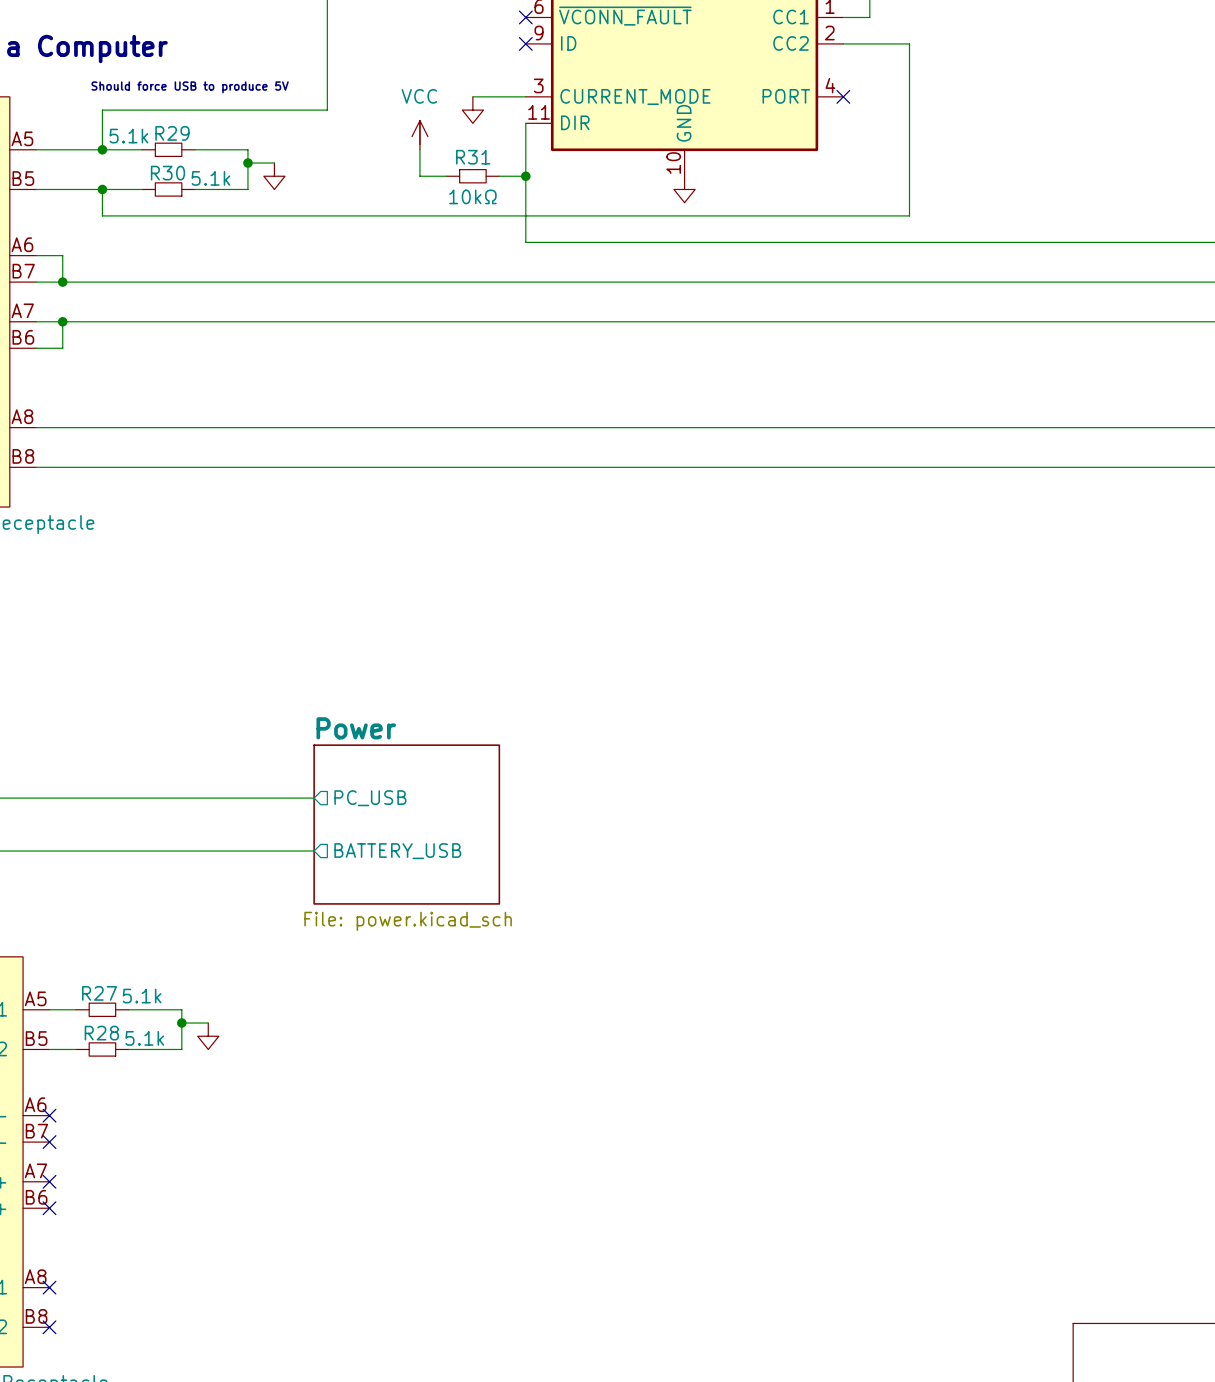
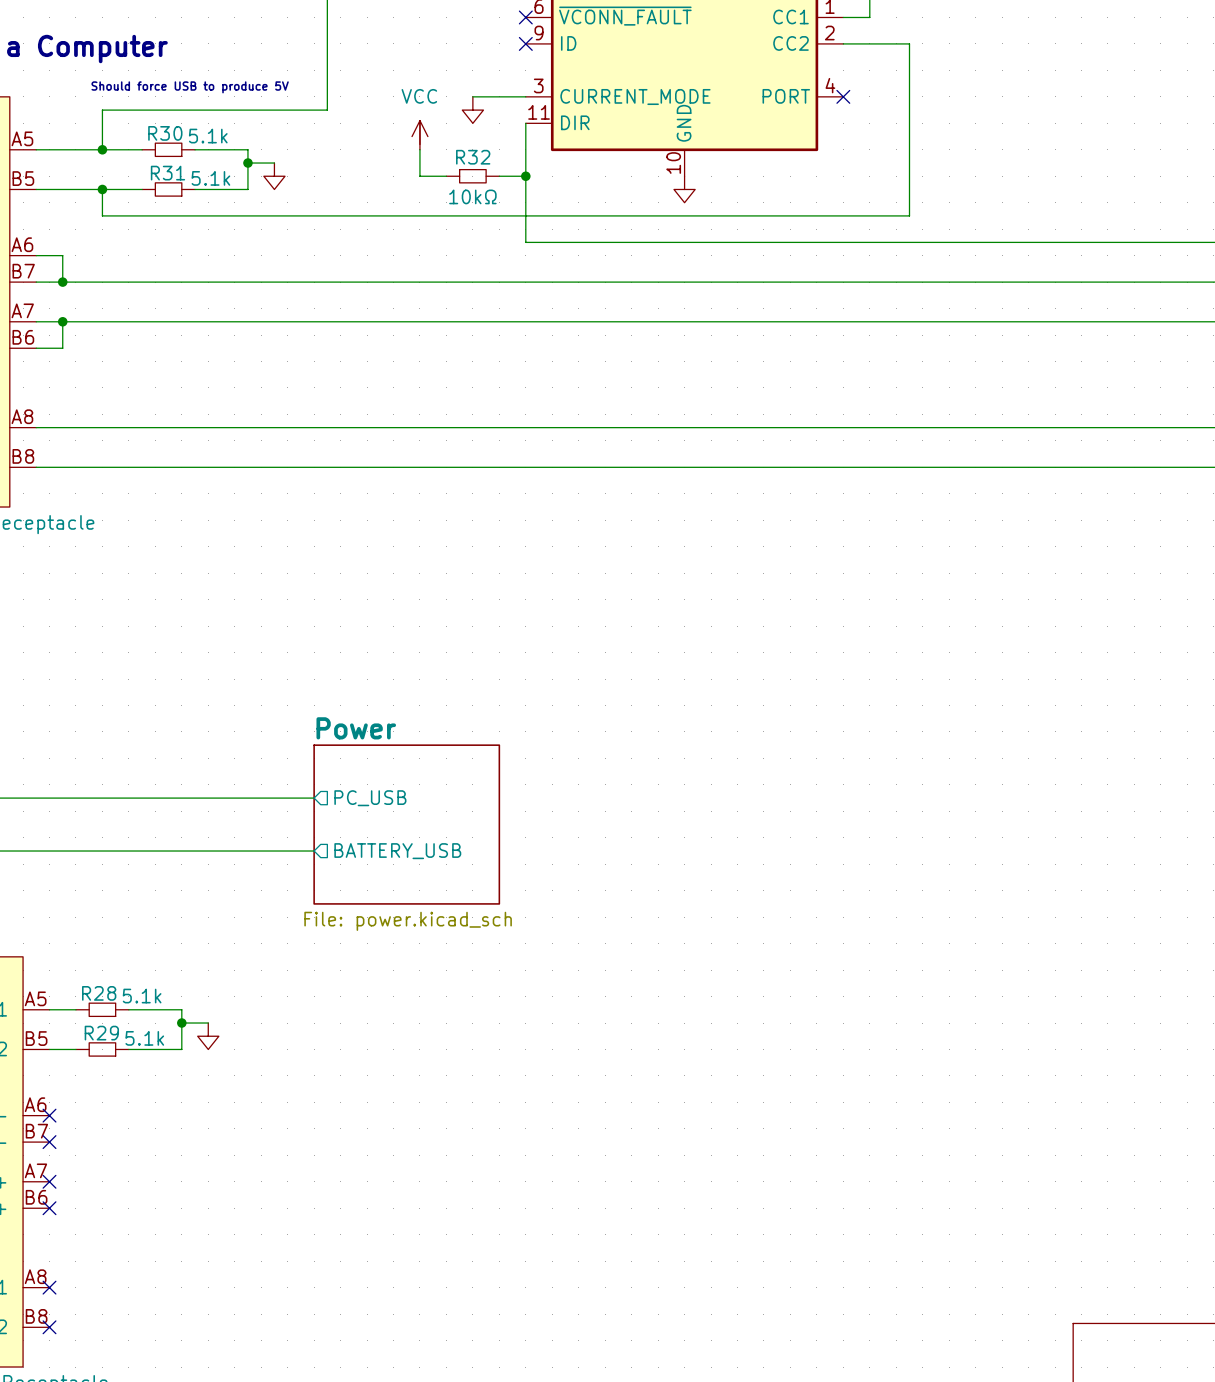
R29 name: R29 (172, 133) -> R30 (165, 133)
R29 value position: 5.1k (128, 136) -> 5.1k (208, 136)
R31 name: R31 (473, 157) -> R32 (473, 157)
R30 name: R30 (167, 173) -> R31 (167, 173)
R27 name: R27 (99, 993) -> R28 (99, 993)
R28 name: R28 (101, 1033) -> R29 (101, 1033)

